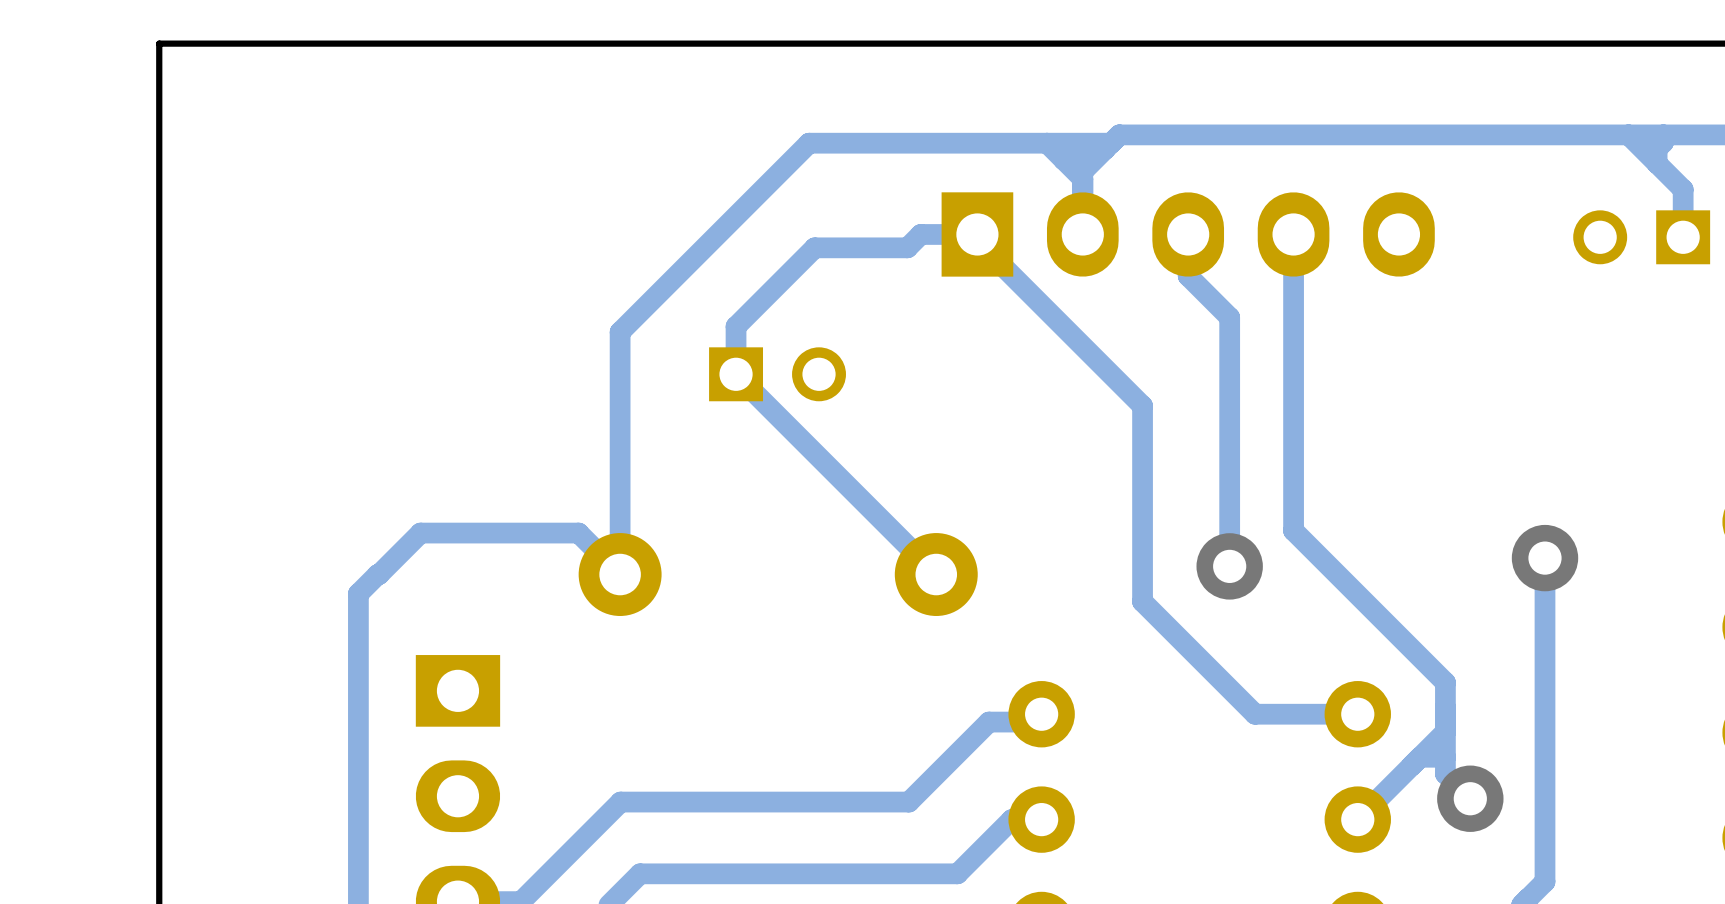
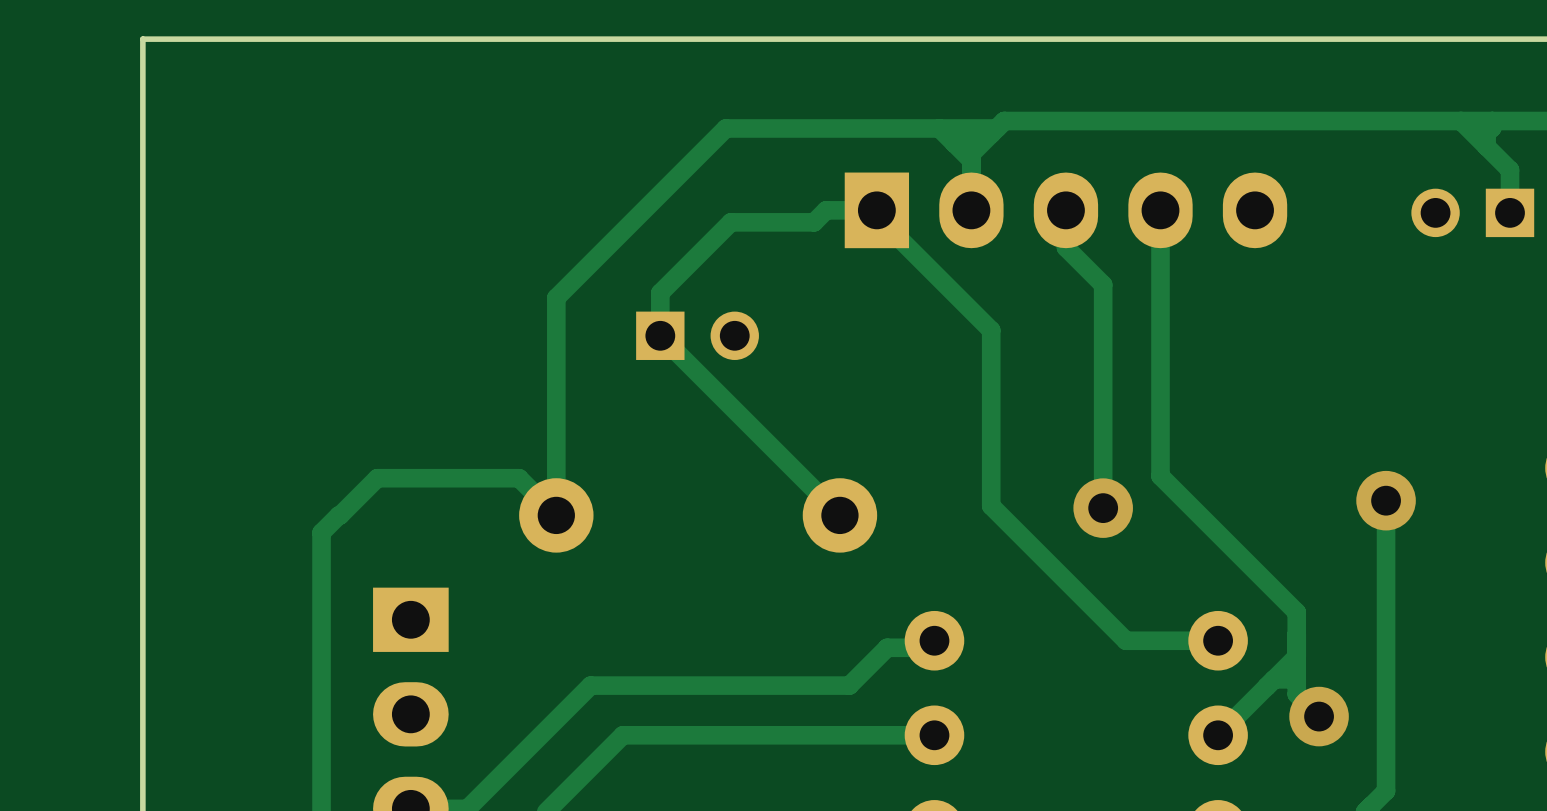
track: (1104, 368) (1142, 405) (1142, 601) -> (991, 330) (991, 505) (1025, 539)
track: (946, 764) (908, 802) (620, 802) -> (849, 685) (590, 685) (556, 719)
track: (1011, 819) (957, 873) (640, 873) -> (907, 735) (622, 735) (574, 783)

